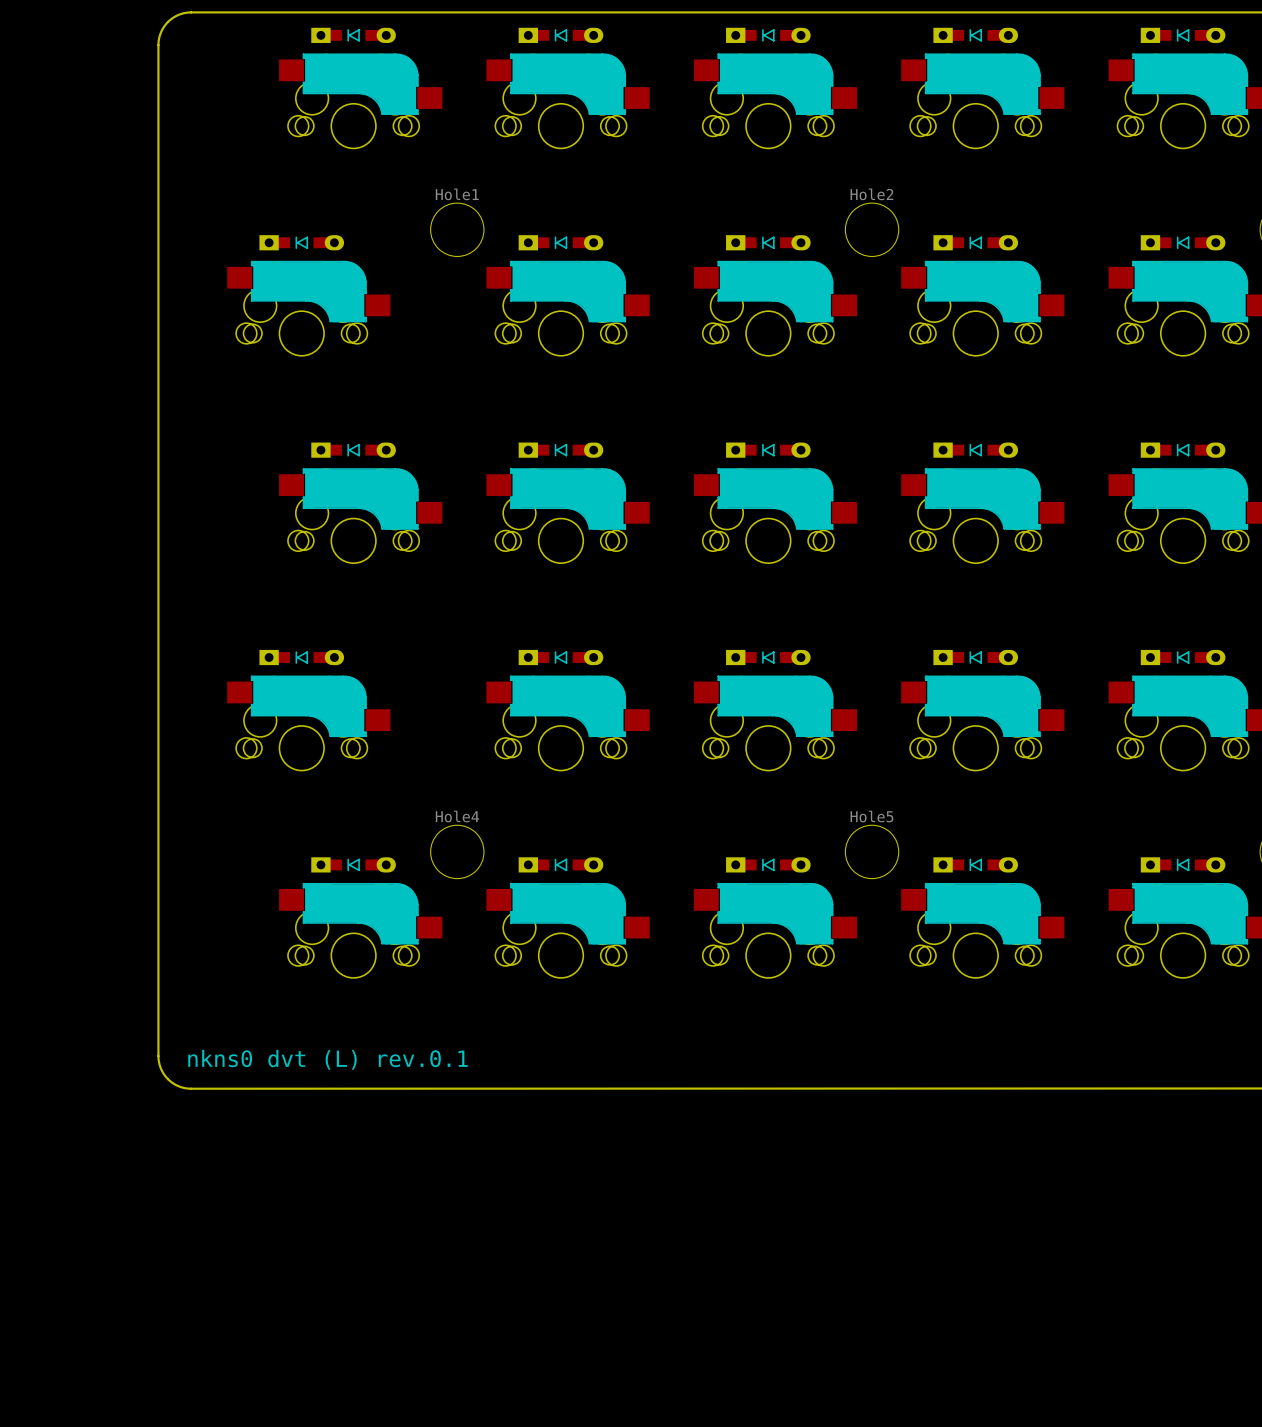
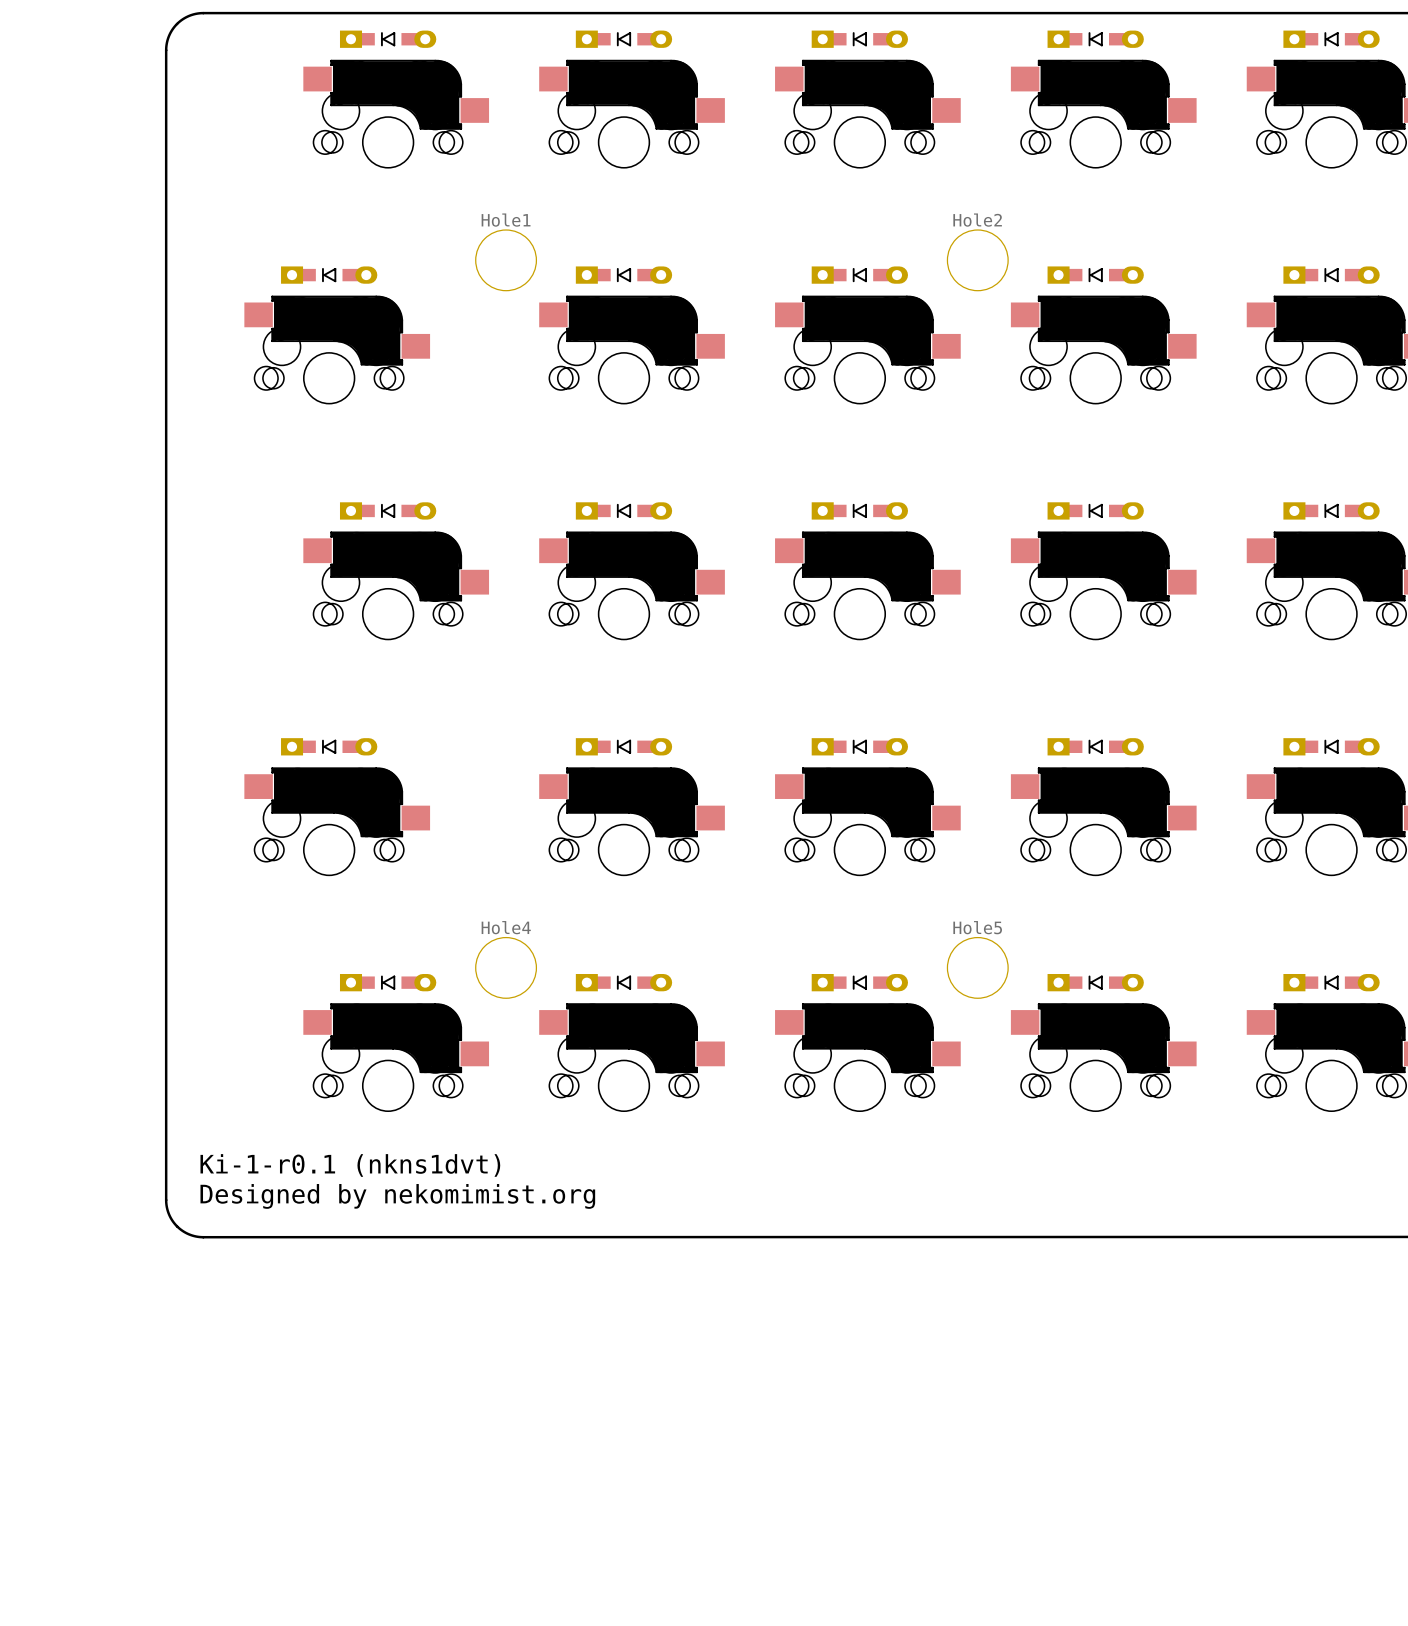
text: none -> Ki-1-r0.1 (nkns1dvt) (350, 1165)
text: none -> Designed by nekomimist.org (397, 1196)
text: nkns0 dvt (L) rev.0.1 (327, 1059) -> none

